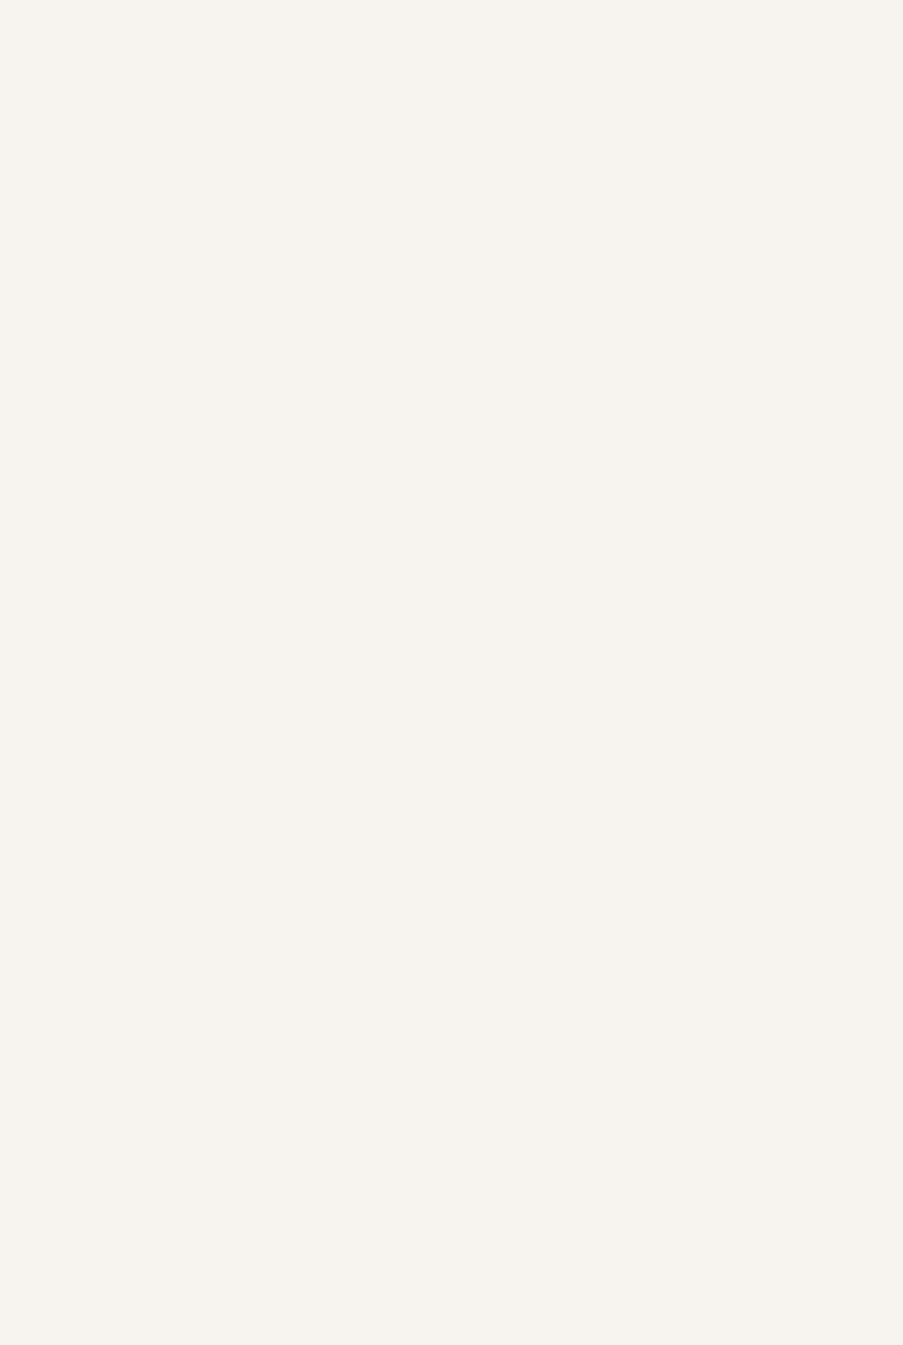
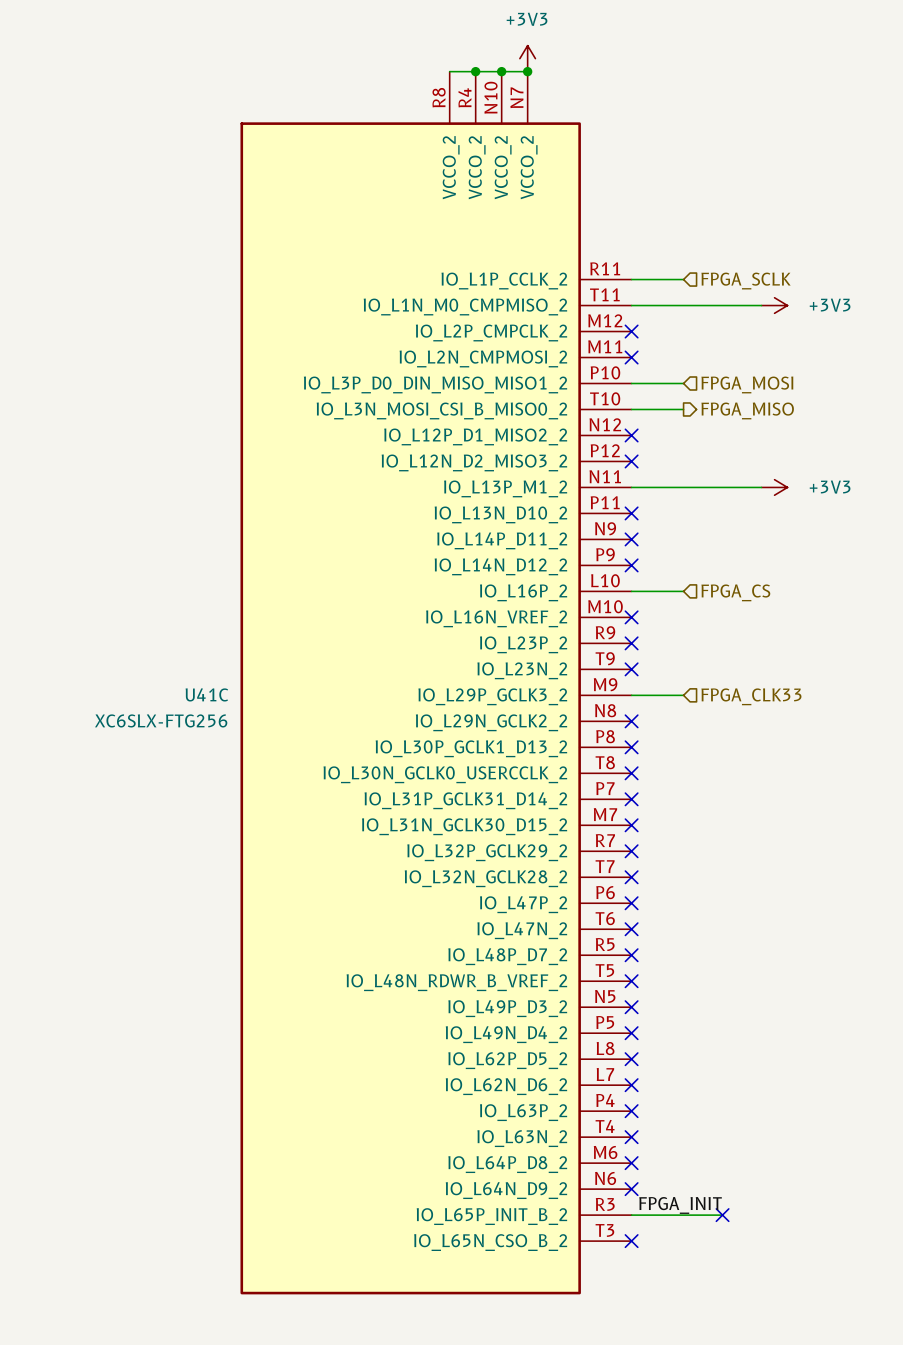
power symbol: none -> +3V3 (527, 58)
wire: none -> (449, 71) (527, 71)
junction: none -> (475, 71)
junction: none -> (501, 71)
junction: none -> (527, 71)
wire: none -> (631, 279) (683, 279)
hierarchical label: none -> FPGA_SCLK (746, 281)
wire: none -> (631, 305) (761, 305)
power symbol: none -> +3V3 (774, 305)
no-connect mark: none -> (631, 331)
no-connect mark: none -> (631, 357)
wire: none -> (631, 383) (683, 383)
hierarchical label: none -> FPGA_MOSI (747, 384)
wire: none -> (631, 409) (683, 409)
hierarchical label: none -> FPGA_MISO (747, 410)
no-connect mark: none -> (631, 435)
no-connect mark: none -> (631, 461)
wire: none -> (631, 487) (761, 487)
power symbol: none -> +3V3 (774, 487)
no-connect mark: none -> (631, 513)
no-connect mark: none -> (631, 539)
no-connect mark: none -> (631, 565)
wire: none -> (631, 591) (683, 591)
hierarchical label: none -> FPGA_CS (735, 592)
no-connect mark: none -> (631, 617)
no-connect mark: none -> (631, 643)
no-connect mark: none -> (631, 669)
U41C: none -> XC6SLX-FTG256 (436, 683)
wire: none -> (631, 695) (683, 695)
hierarchical label: none -> FPGA_CLK33 (751, 696)
no-connect mark: none -> (631, 721)
no-connect mark: none -> (631, 747)
no-connect mark: none -> (631, 773)
no-connect mark: none -> (631, 799)
no-connect mark: none -> (631, 825)
no-connect mark: none -> (631, 851)
no-connect mark: none -> (631, 877)
no-connect mark: none -> (631, 903)
no-connect mark: none -> (631, 929)
no-connect mark: none -> (631, 955)
no-connect mark: none -> (631, 981)
no-connect mark: none -> (631, 1007)
no-connect mark: none -> (631, 1033)
no-connect mark: none -> (631, 1059)
no-connect mark: none -> (631, 1085)
no-connect mark: none -> (631, 1111)
no-connect mark: none -> (631, 1137)
no-connect mark: none -> (631, 1163)
no-connect mark: none -> (631, 1189)
label: none -> FPGA_INIT (680, 1205)
wire: none -> (631, 1215) (722, 1215)
no-connect mark: none -> (722, 1215)
no-connect mark: none -> (631, 1241)

